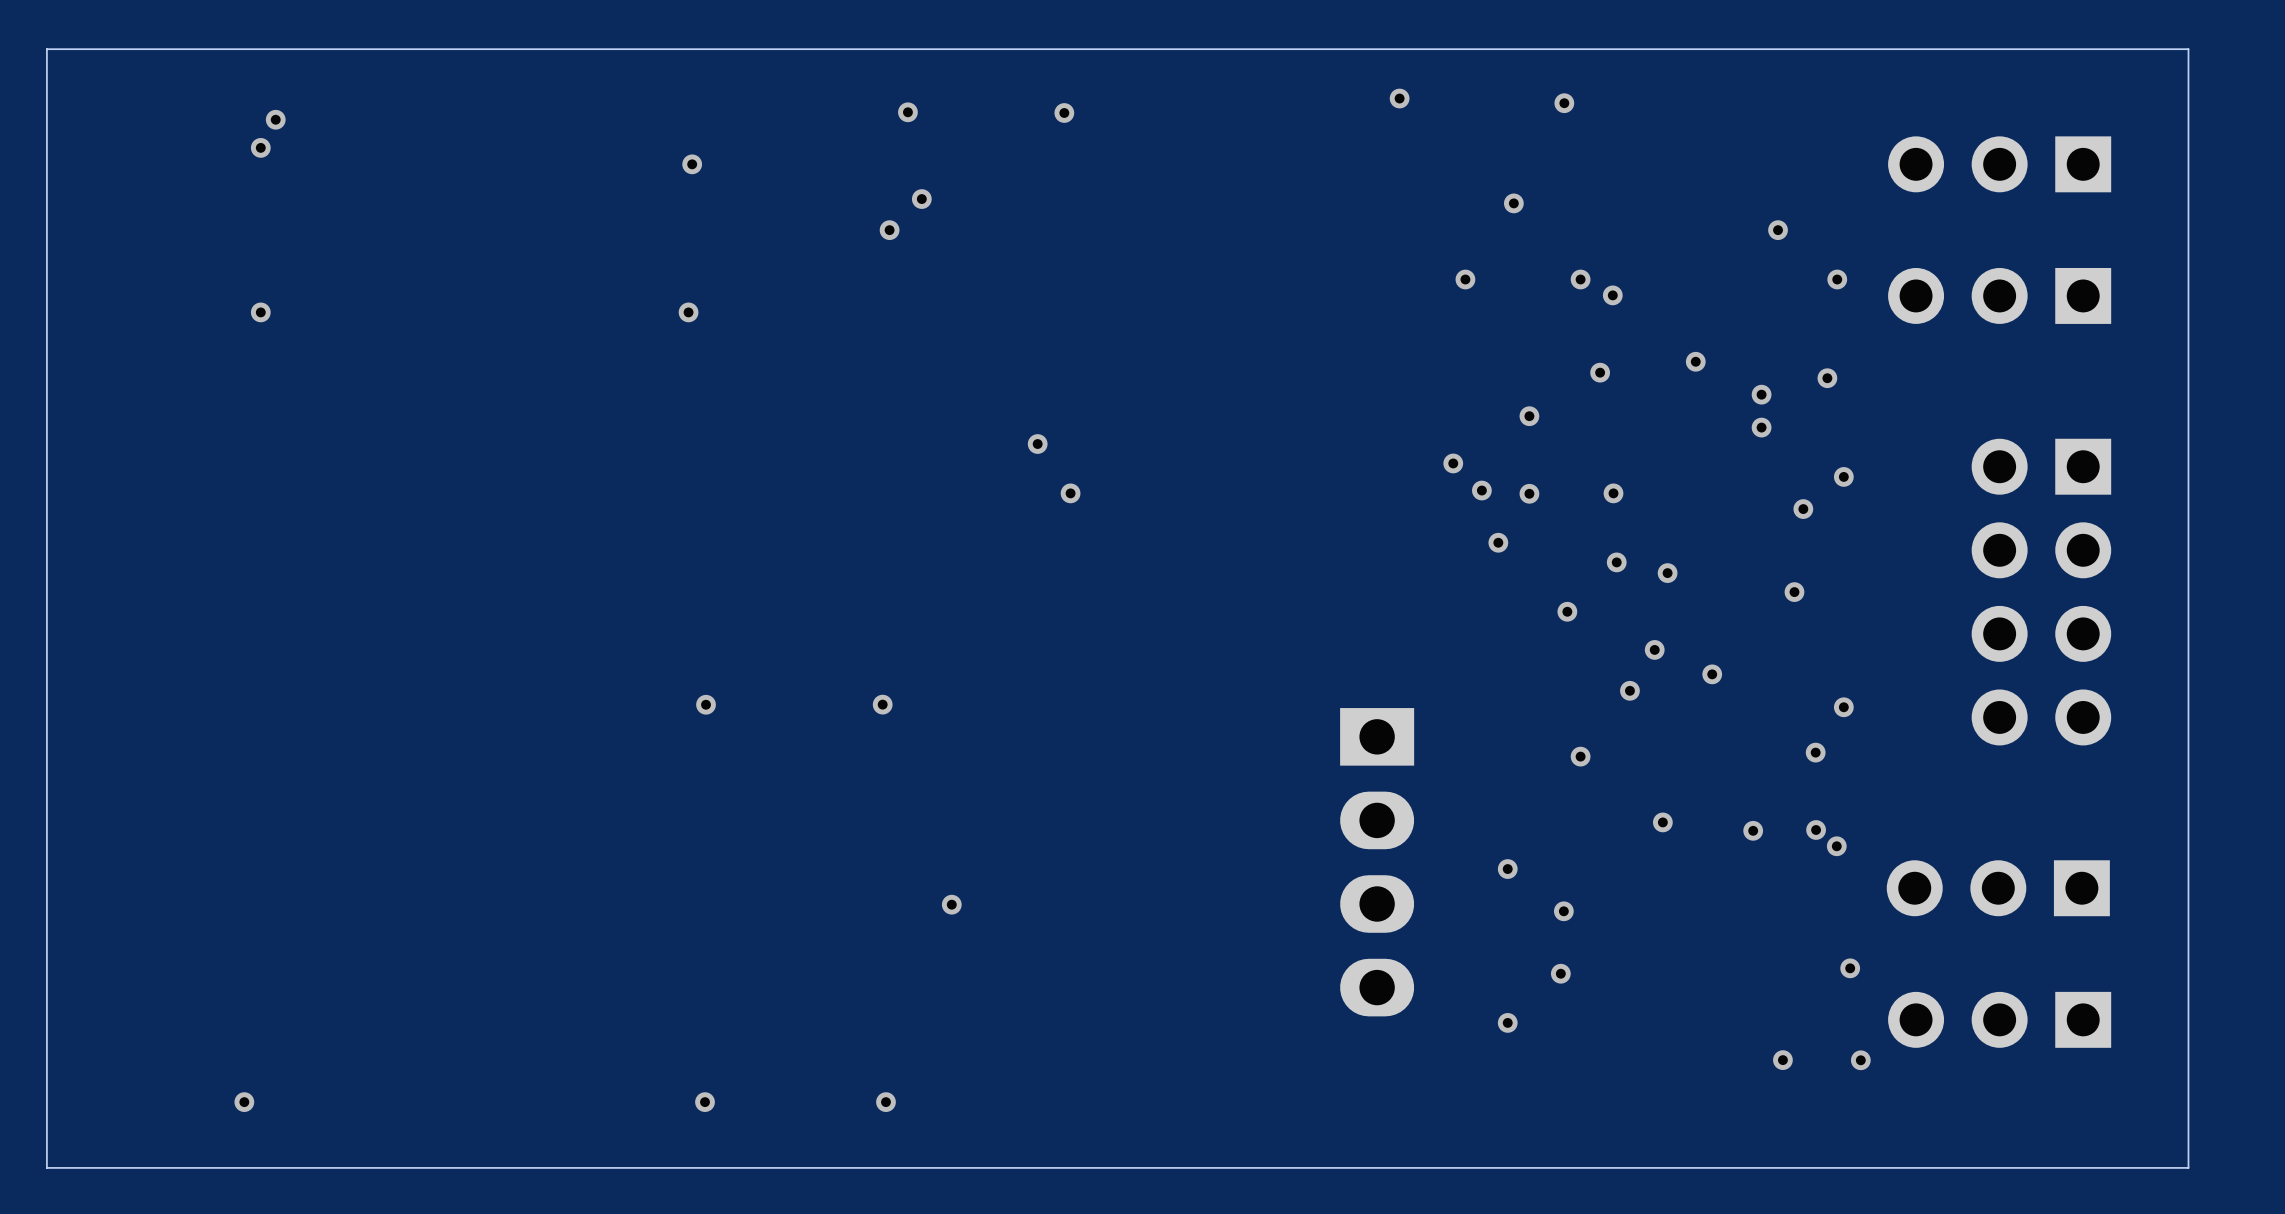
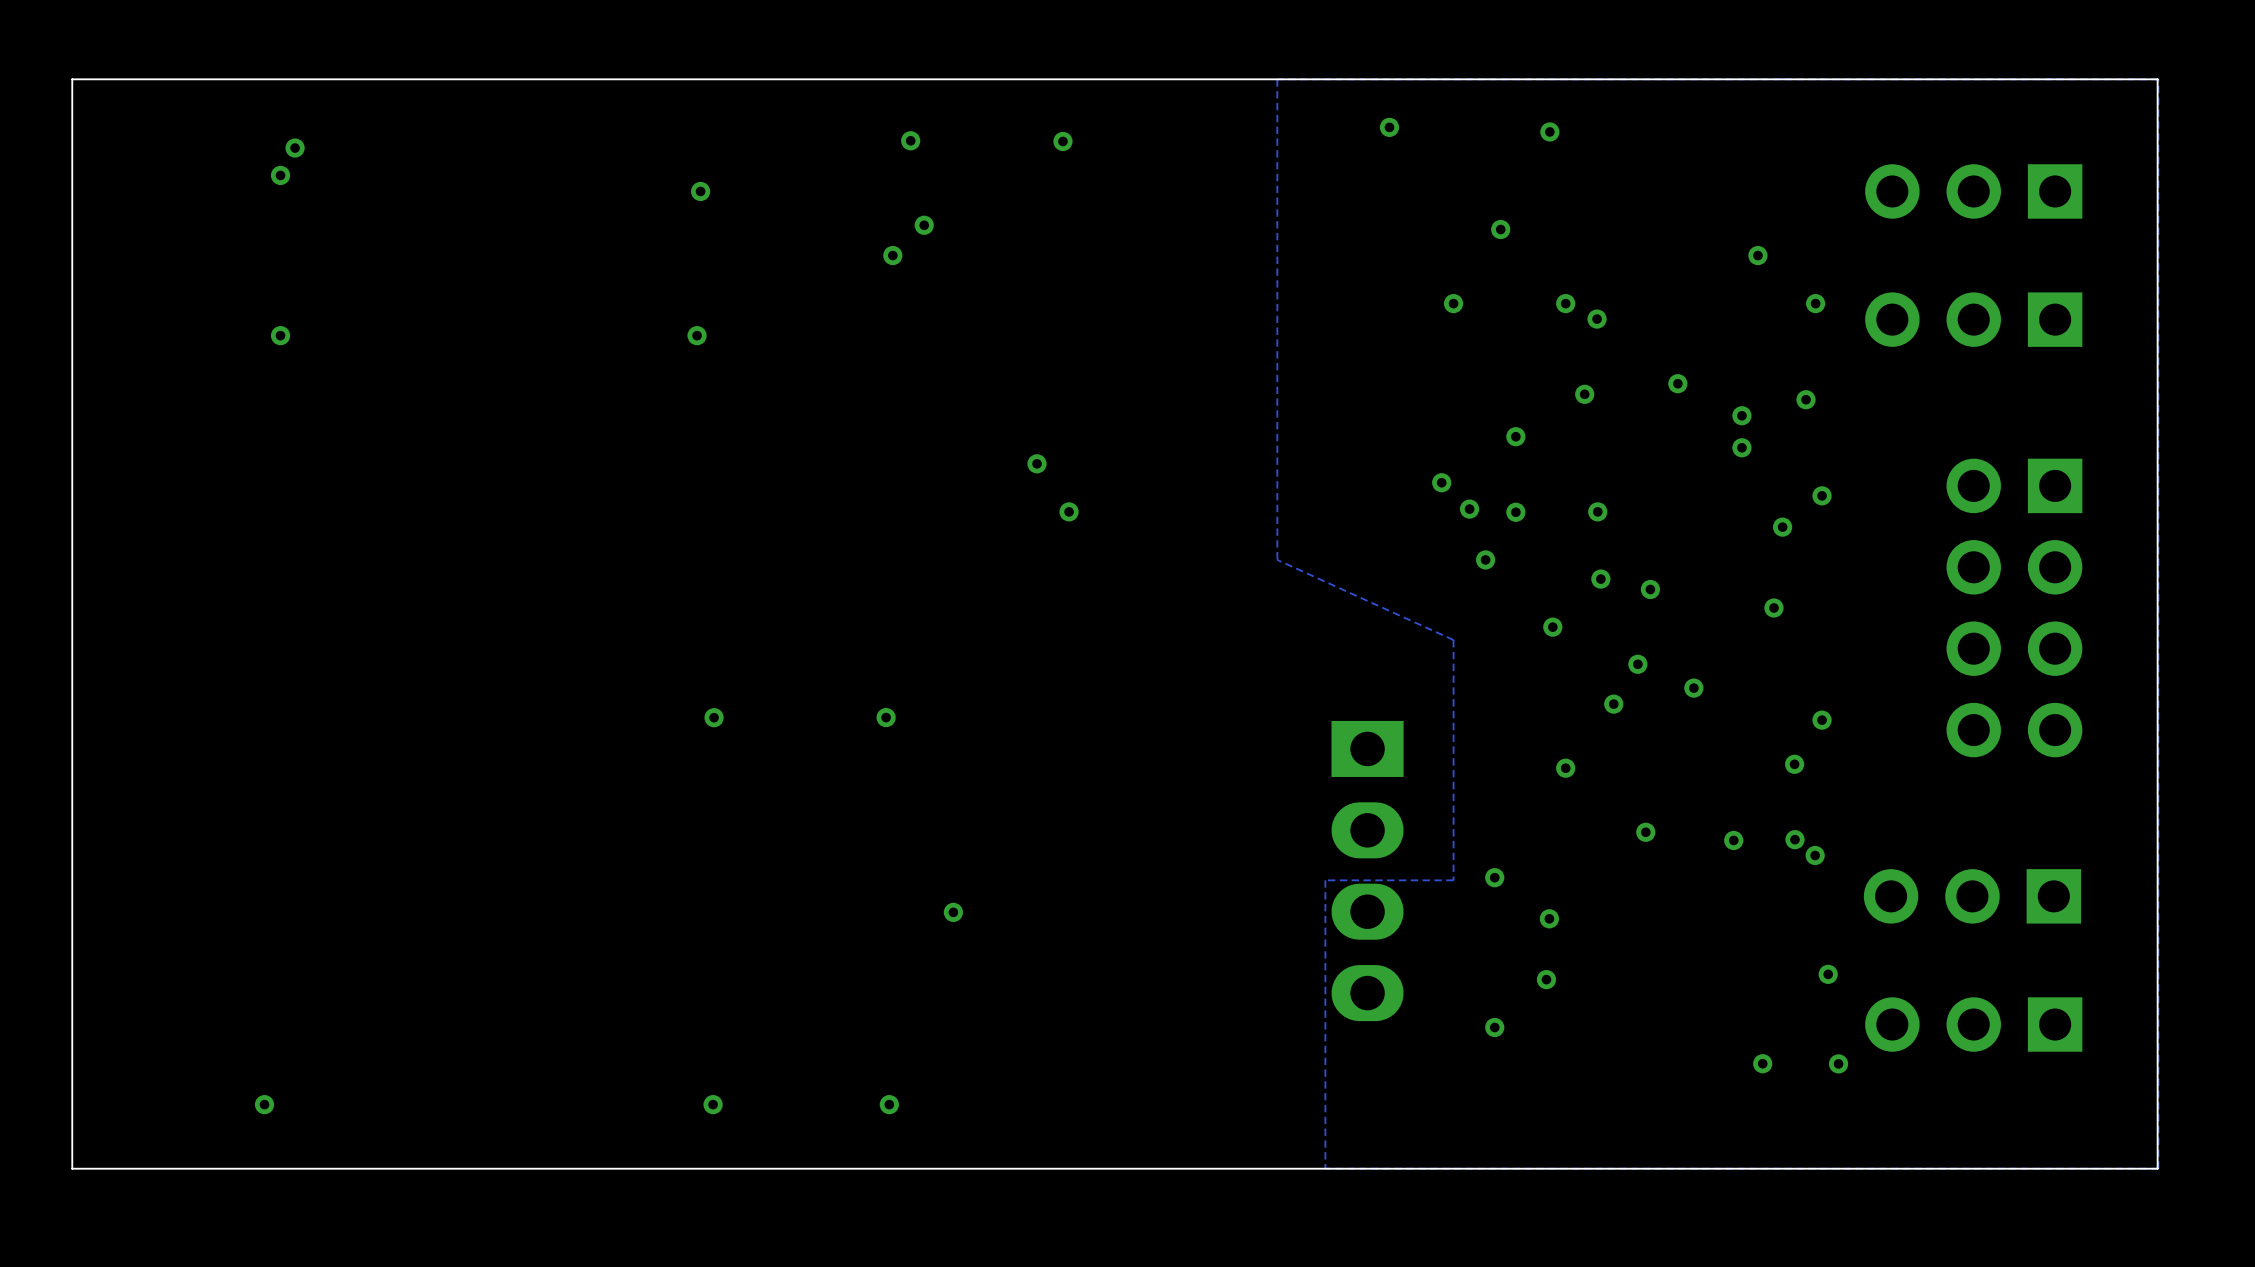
zone outline: none -> (2158, 79) (2158, 1168) (1325, 1168) (1325, 880) (1453, 880) (1453, 640) (1277, 559) (1277, 79) (2158, 79)

